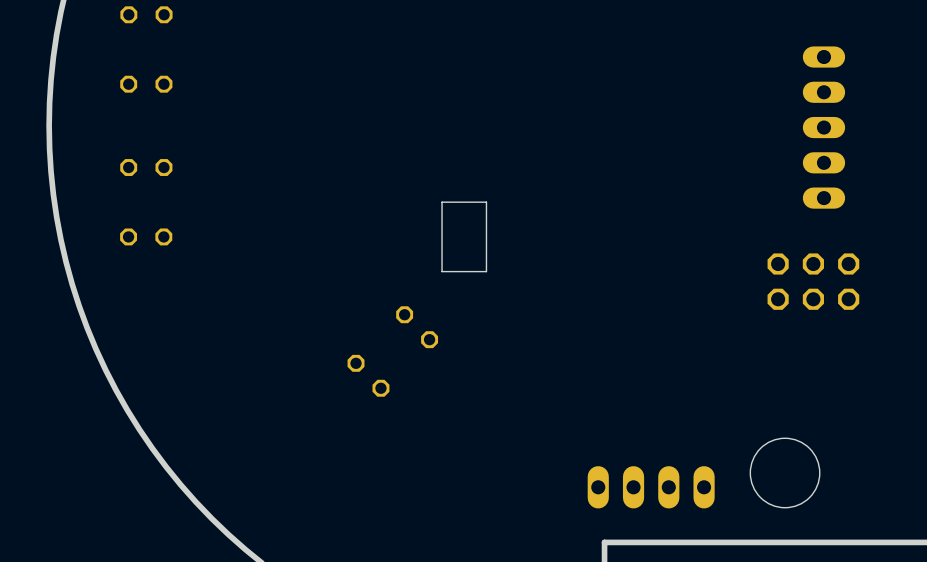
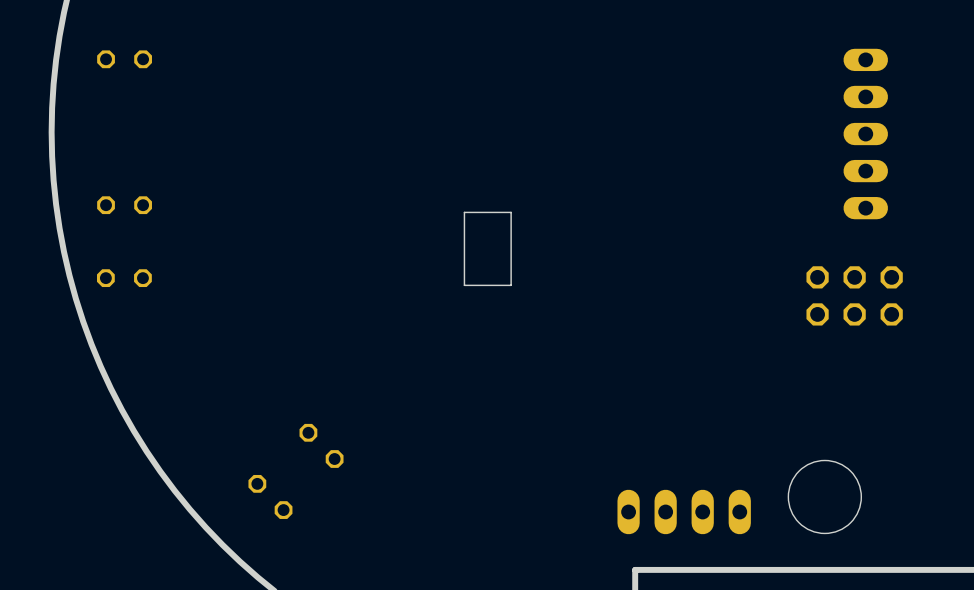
part: (146, 14) -> none
part: none -> (124, 59)
part: (146, 84) -> none
part: (146, 167) -> none
part: none -> (124, 205)
part: (146, 236) -> none
part: none -> (124, 278)
part: (417, 327) -> none
part: (368, 375) -> none
part: none -> (321, 445)
part: none -> (270, 496)

